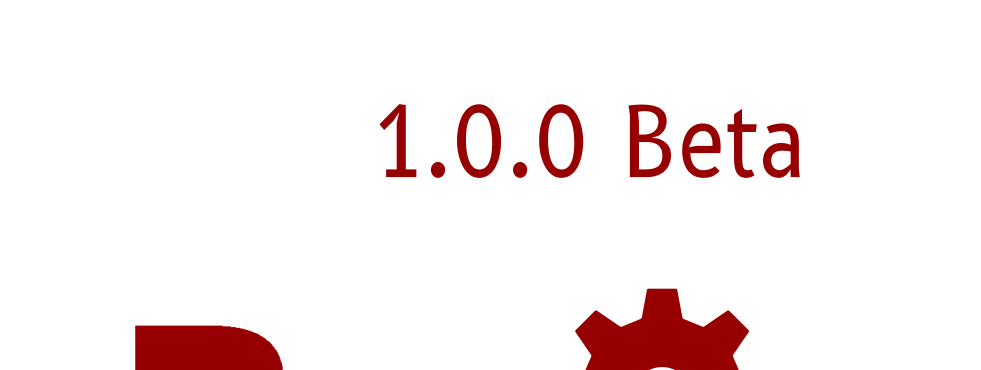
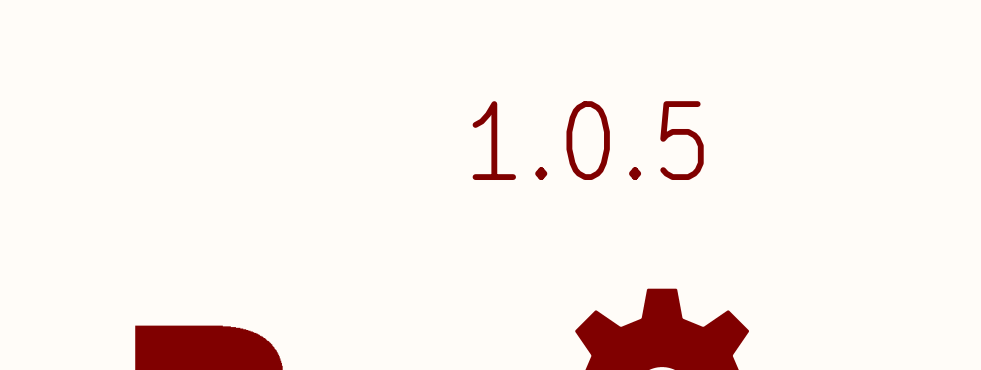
text: 1.0.0 Beta (589, 140) -> 1.0.5 (588, 140)

